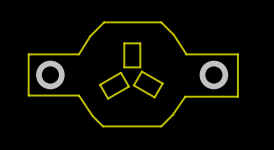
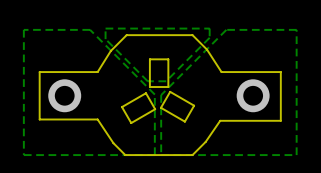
zone outline: none -> (209, 28) (209, 37) (166, 81) (147, 81) (105, 39) (105, 28) (209, 28)
zone outline: none -> (90, 29) (154, 94) (154, 155) (23, 155) (23, 29) (90, 29)
zone outline: none -> (296, 29) (226, 29) (161, 95) (161, 155) (296, 155) (296, 29)

